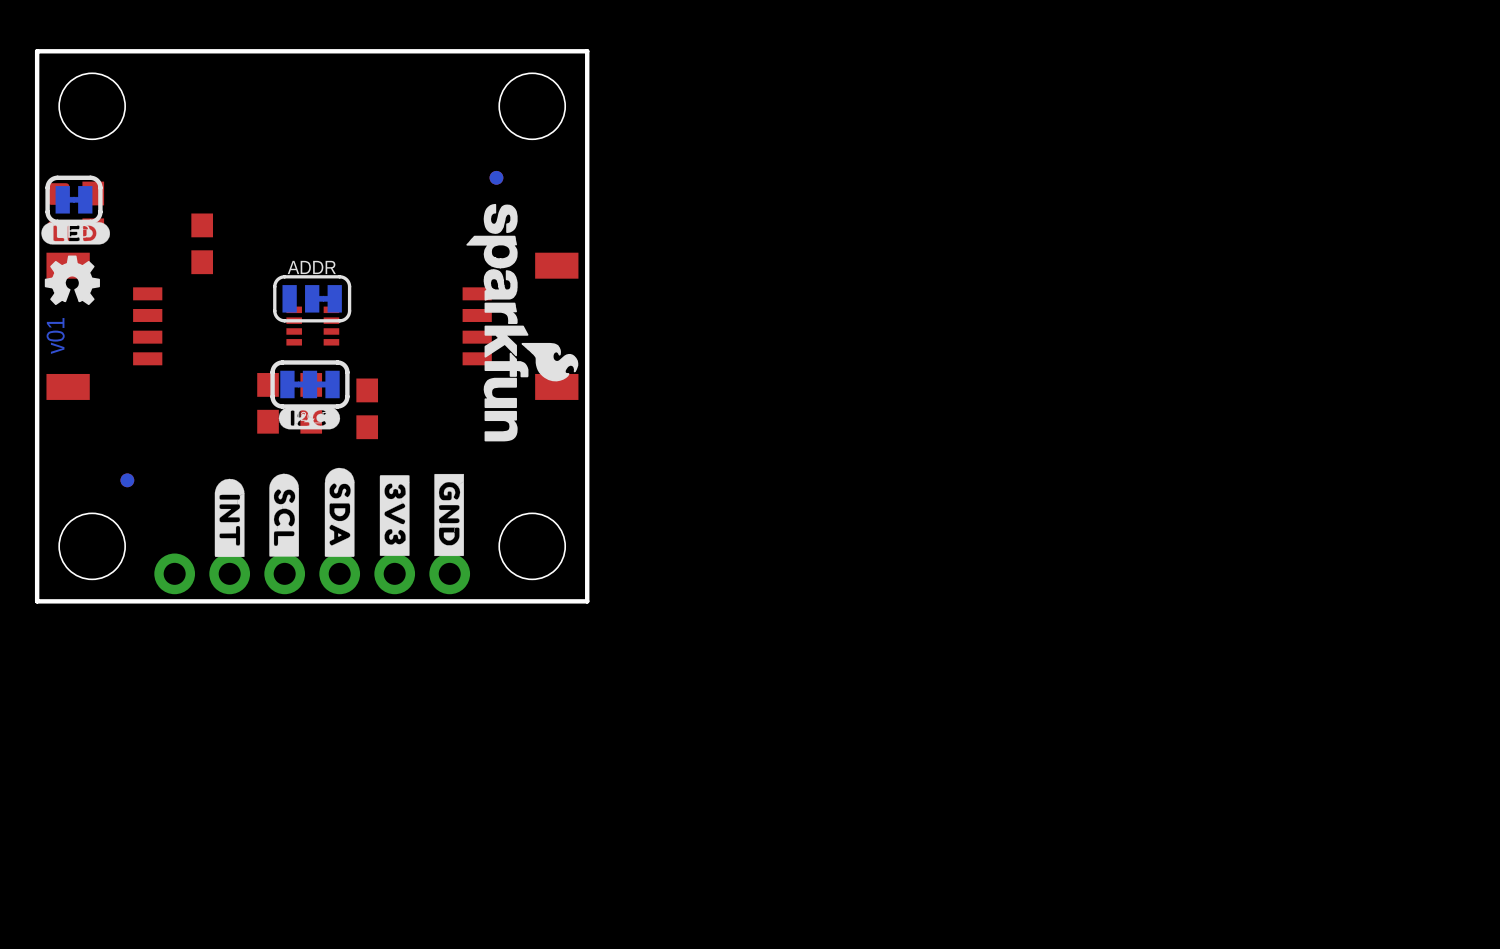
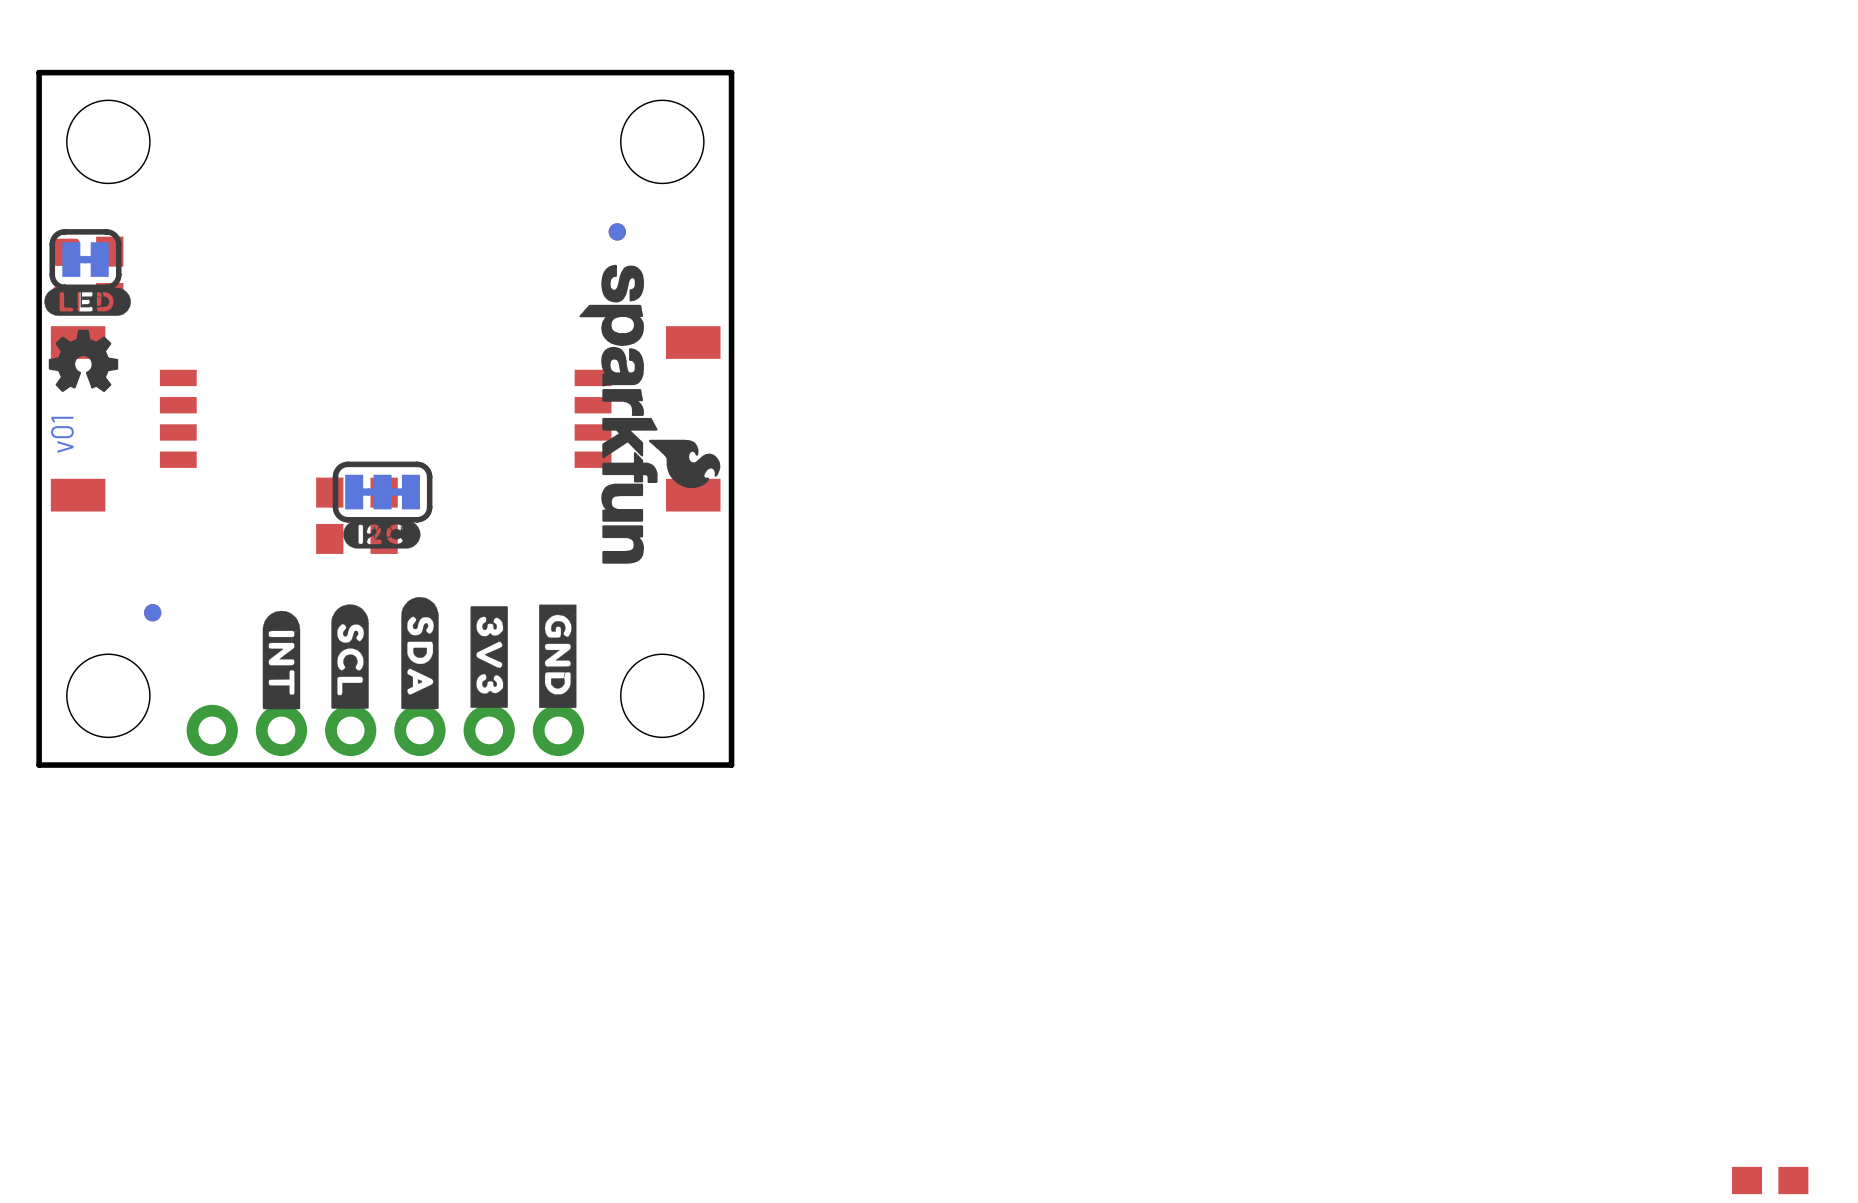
part: (202, 243) -> none
ADDR: (312, 298) -> none
part: (312, 326) -> none
part: (367, 408) -> none
part: none -> (1770, 1180)

